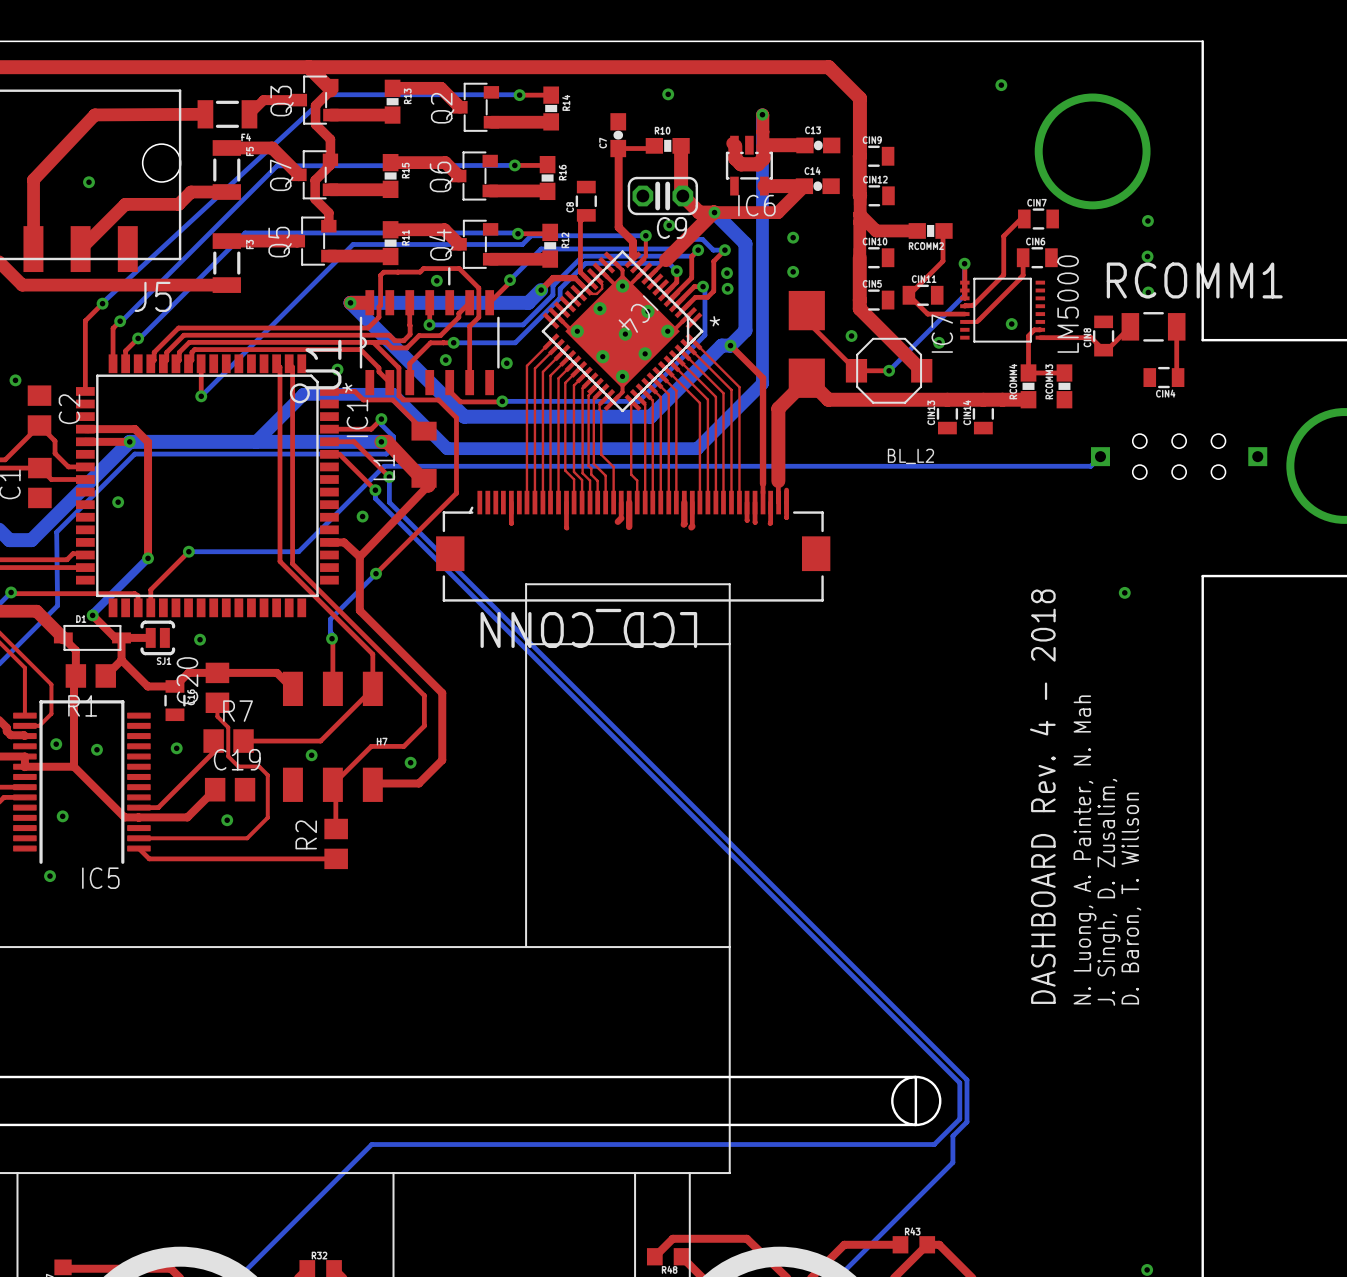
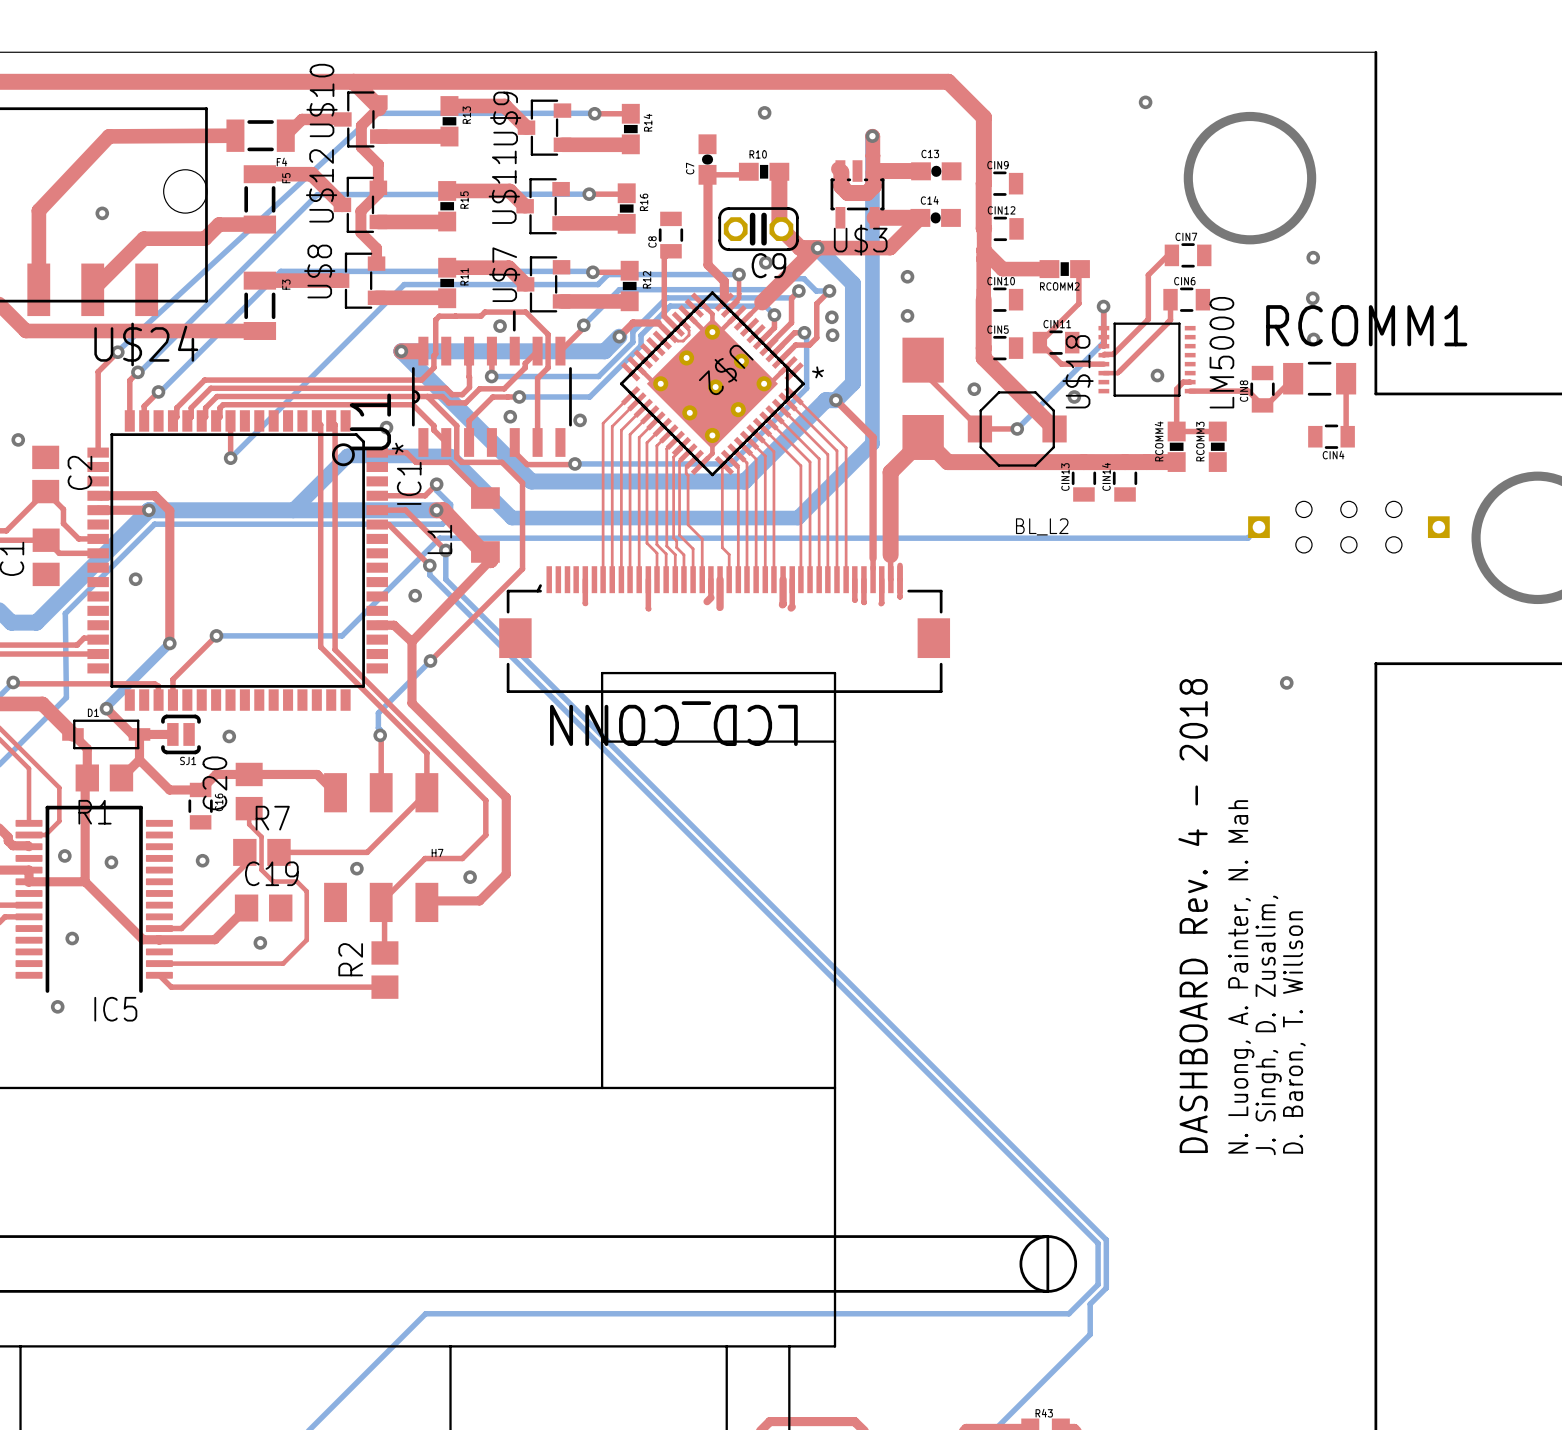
Q3 name: Q3 (282, 101) -> U$10 (322, 100)
Q2 name: Q2 (442, 108) -> U$9 (505, 118)
Q7 name: Q7 (281, 175) -> U$12 (321, 185)
Q6 name: Q6 (441, 176) -> U$11 (504, 187)
IC6 name: IC6 (756, 205) -> U$3 (860, 240)
Q5 name: Q5 (280, 242) -> U$8 (319, 271)
Q4 name: Q4 (441, 244) -> U$7 (504, 274)
J5 name: J5 (153, 296) -> U$24 (146, 344)
IC4 name: IC4 (638, 314) -> U$2 (726, 369)
IC7 name: IC7 (942, 333) -> U$18 (1078, 371)

